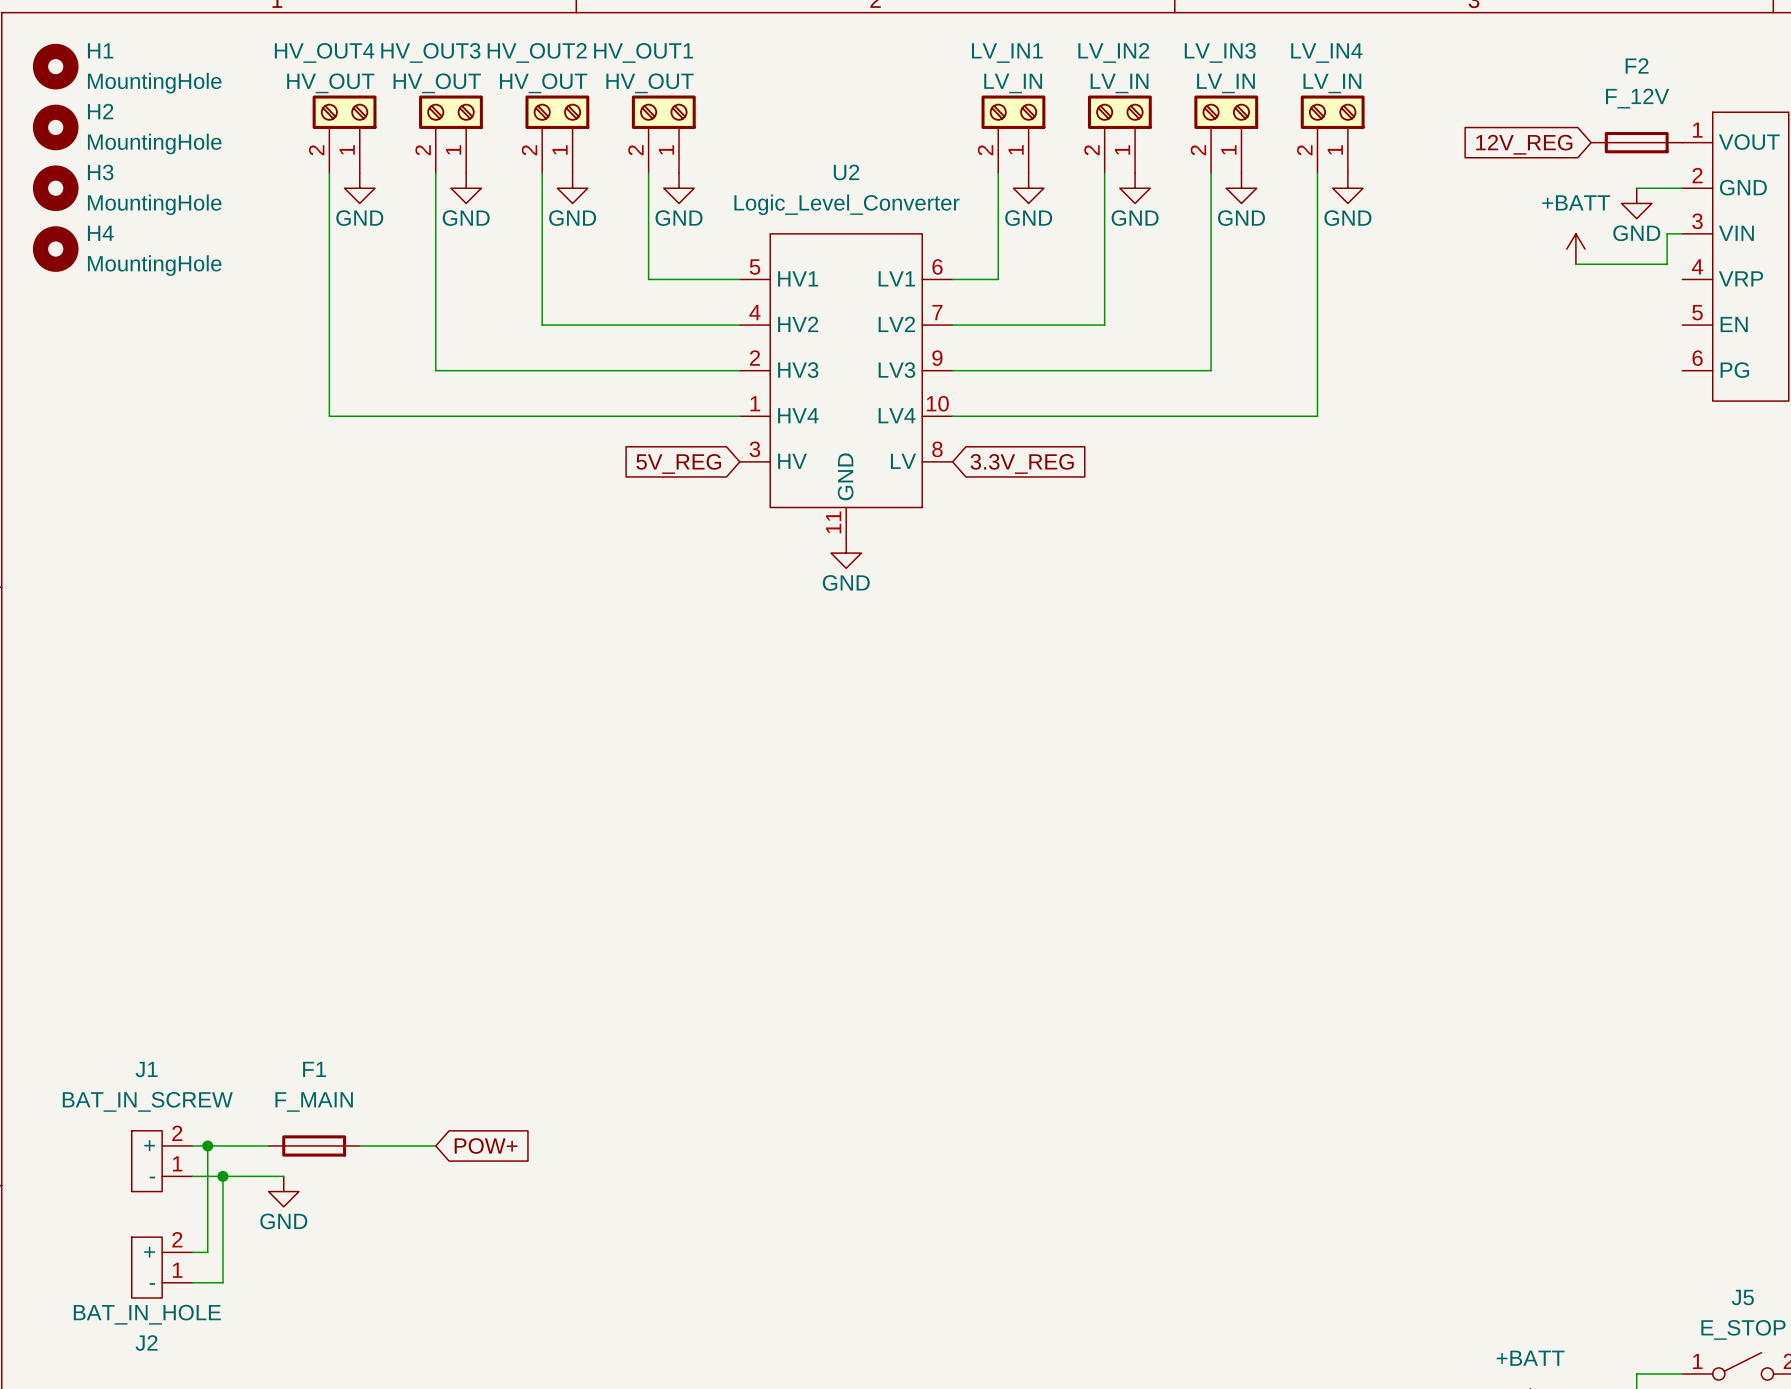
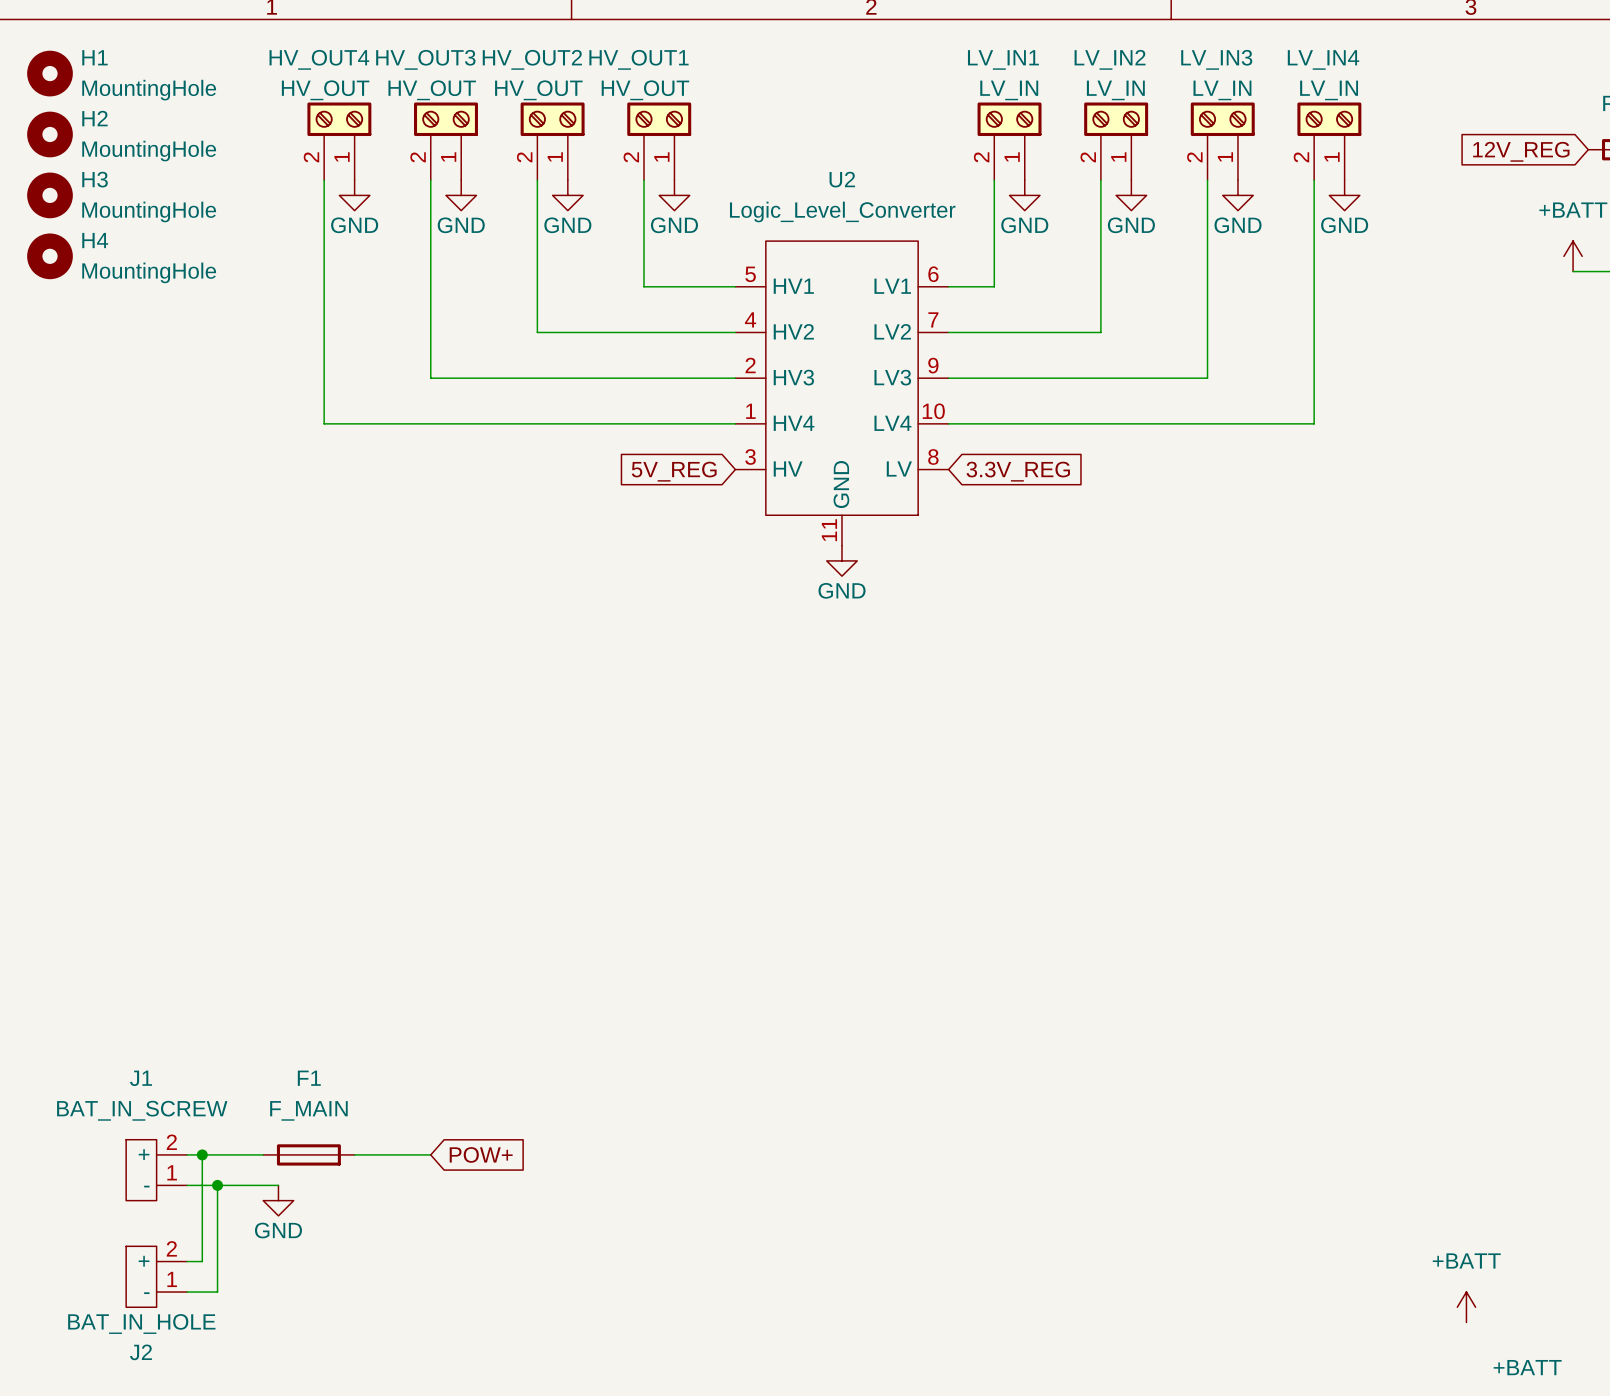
power symbol: none -> +BATT (1466, 1307)

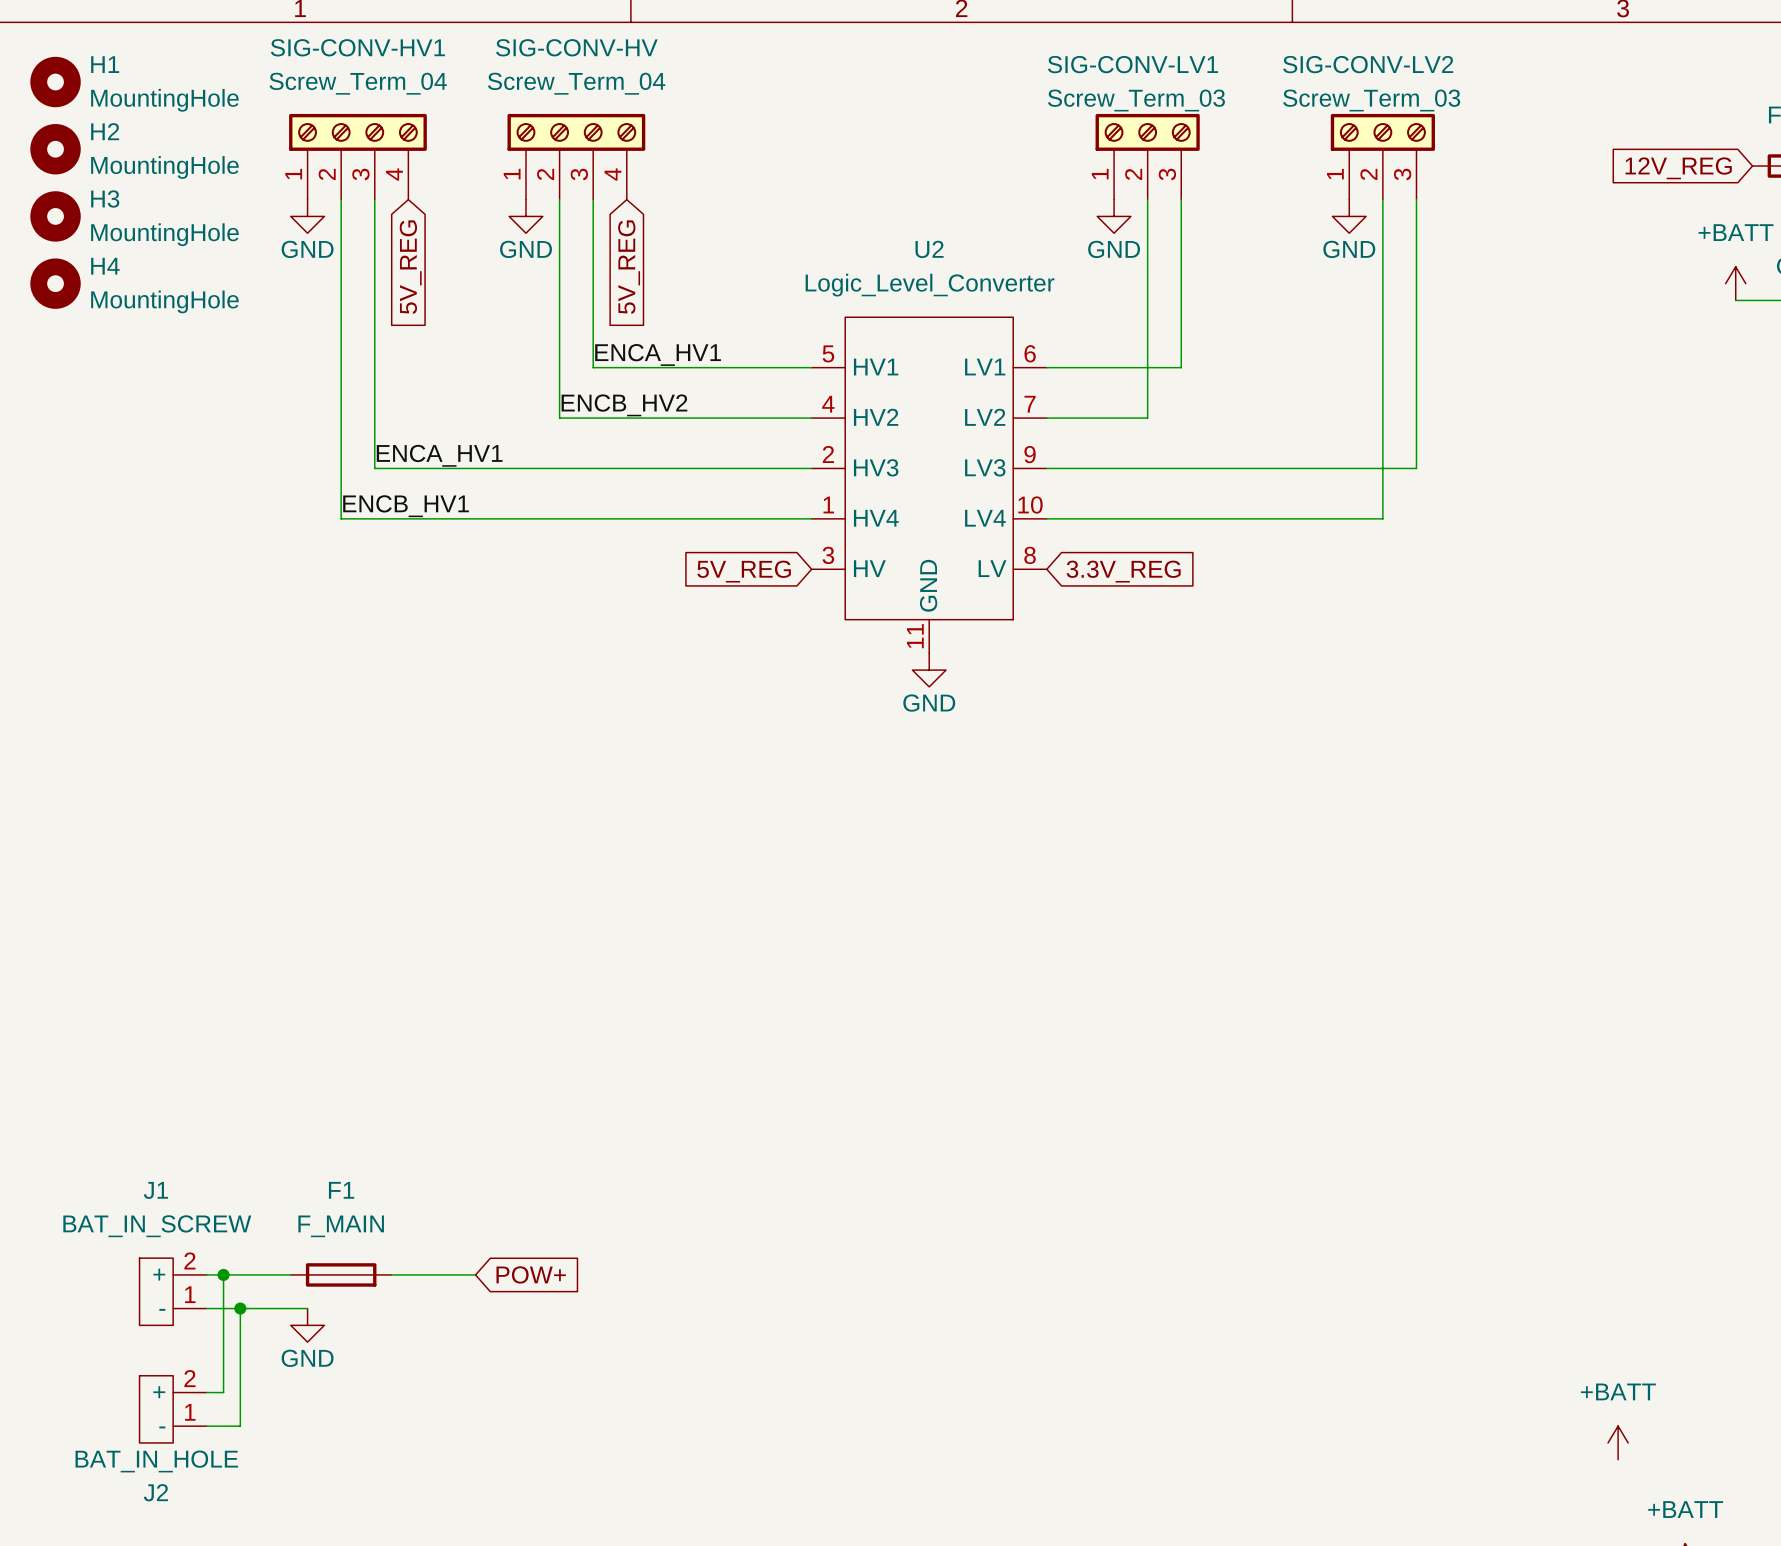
SIG-CONV-HV1: none -> Screw_Term_04 (357, 156)
HV_OUT4: HV_OUT (339, 141) -> none
HV_OUT3: HV_OUT (445, 141) -> none
SIG-CONV-HV: none -> Screw_Term_04 (576, 156)
HV_OUT2: HV_OUT (552, 141) -> none
HV_OUT1: HV_OUT (659, 141) -> none
LV_IN1: LV_IN (1009, 141) -> none
SIG-CONV-LV1: none -> Screw_Term_03 (1147, 156)
LV_IN2: LV_IN (1116, 141) -> none
LV_IN3: LV_IN (1222, 141) -> none
SIG-CONV-LV2: none -> Screw_Term_03 (1382, 156)
LV_IN4: LV_IN (1329, 141) -> none
wire: none -> (341, 199) (341, 518) (811, 518)
wire: (324, 180) (324, 423) (339, 423) -> (374, 199) (374, 468)
wire: (430, 180) (430, 378) (506, 378) -> (559, 199) (559, 418)
wire: (643, 180) (643, 286) (735, 286) -> none
wire: (994, 180) (994, 286) (948, 286) -> none
wire: (1100, 180) (1100, 332) (1070, 332) -> (1181, 199) (1181, 367)
wire: (1207, 180) (1207, 378) (1039, 378) -> (1147, 199) (1147, 418)
wire: none -> (1382, 199) (1382, 518) (1046, 518)
wire: (1314, 180) (1314, 423) (1283, 423) -> (1416, 199) (1416, 468)
power symbol: none -> GND (307, 216)
power symbol: GND (354, 195) -> none
power symbol position: GND (461, 195) -> GND (525, 216)
power symbol: GND (567, 195) -> none
power symbol: GND (674, 195) -> none
power symbol position: GND (1024, 195) -> GND (1114, 216)
power symbol: GND (1131, 195) -> none
power symbol position: GND (1237, 195) -> GND (1349, 216)
power symbol: GND (1344, 195) -> none
global label: none -> 5V_REG (410, 267)
global label: none -> 5V_REG (629, 267)
label: none -> ENCA_HV1 (658, 354)
label: none -> ENCB_HV2 (624, 405)
U2 position: (841, 393) -> (929, 485)
label: none -> ENCA_HV1 (439, 455)
label: none -> ENCB_HV1 (406, 506)
global label position: 5V_REG (674, 471) -> 5V_REG (744, 571)
global label position: 3.3V_REG (1018, 471) -> 3.3V_REG (1123, 571)
power symbol position: GND (841, 560) -> GND (929, 670)

